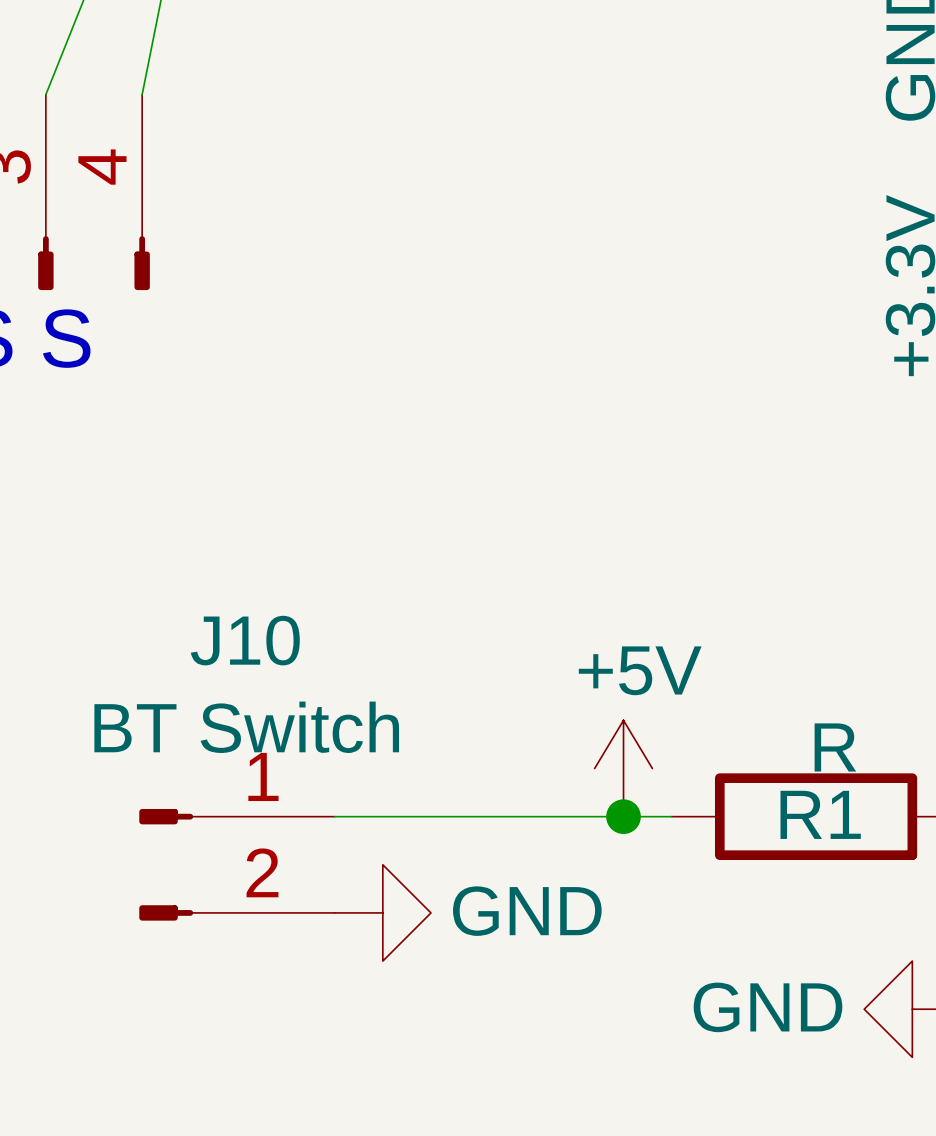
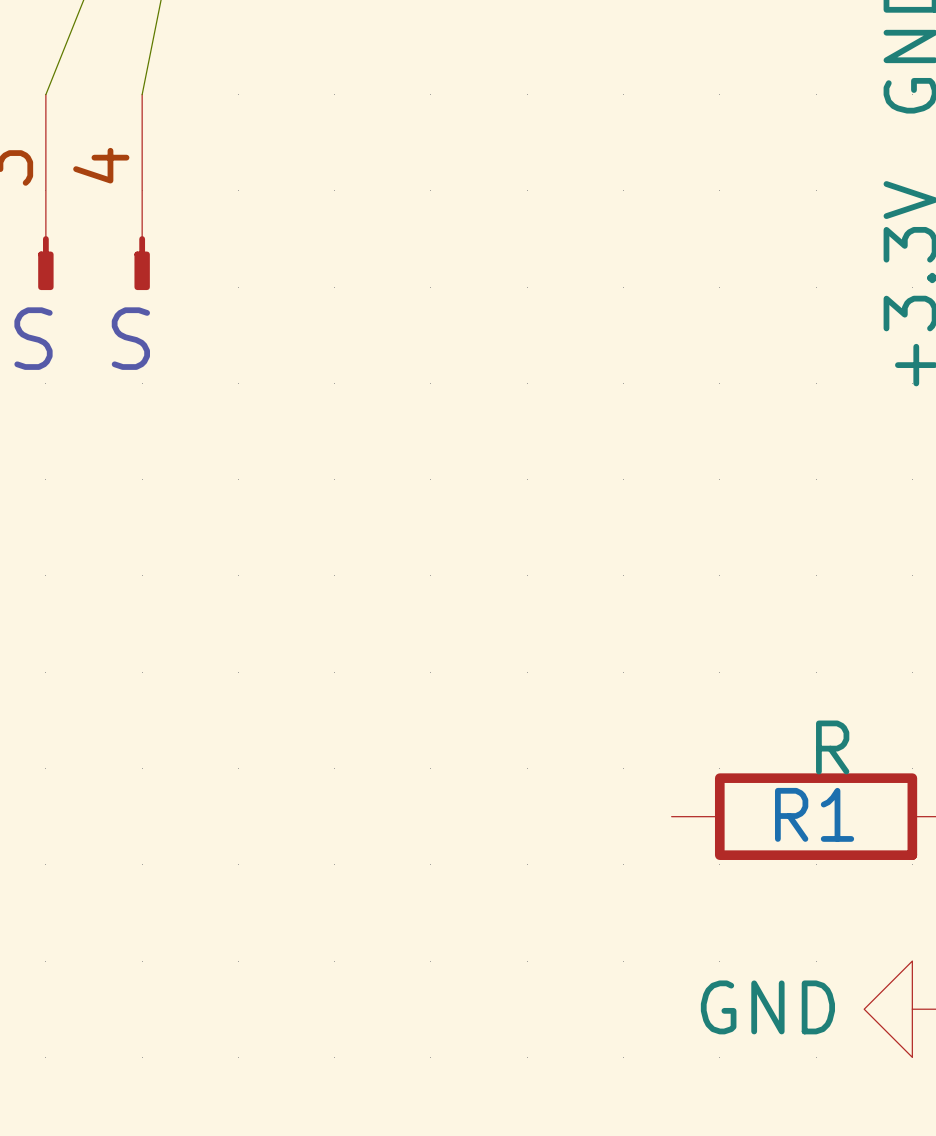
power symbol: +5V (623, 768) -> none
wire: (334, 816) (671, 816) -> none
junction: (623, 816) -> none
J10: BT Switch (236, 864) -> none
power symbol: GND (382, 912) -> none

